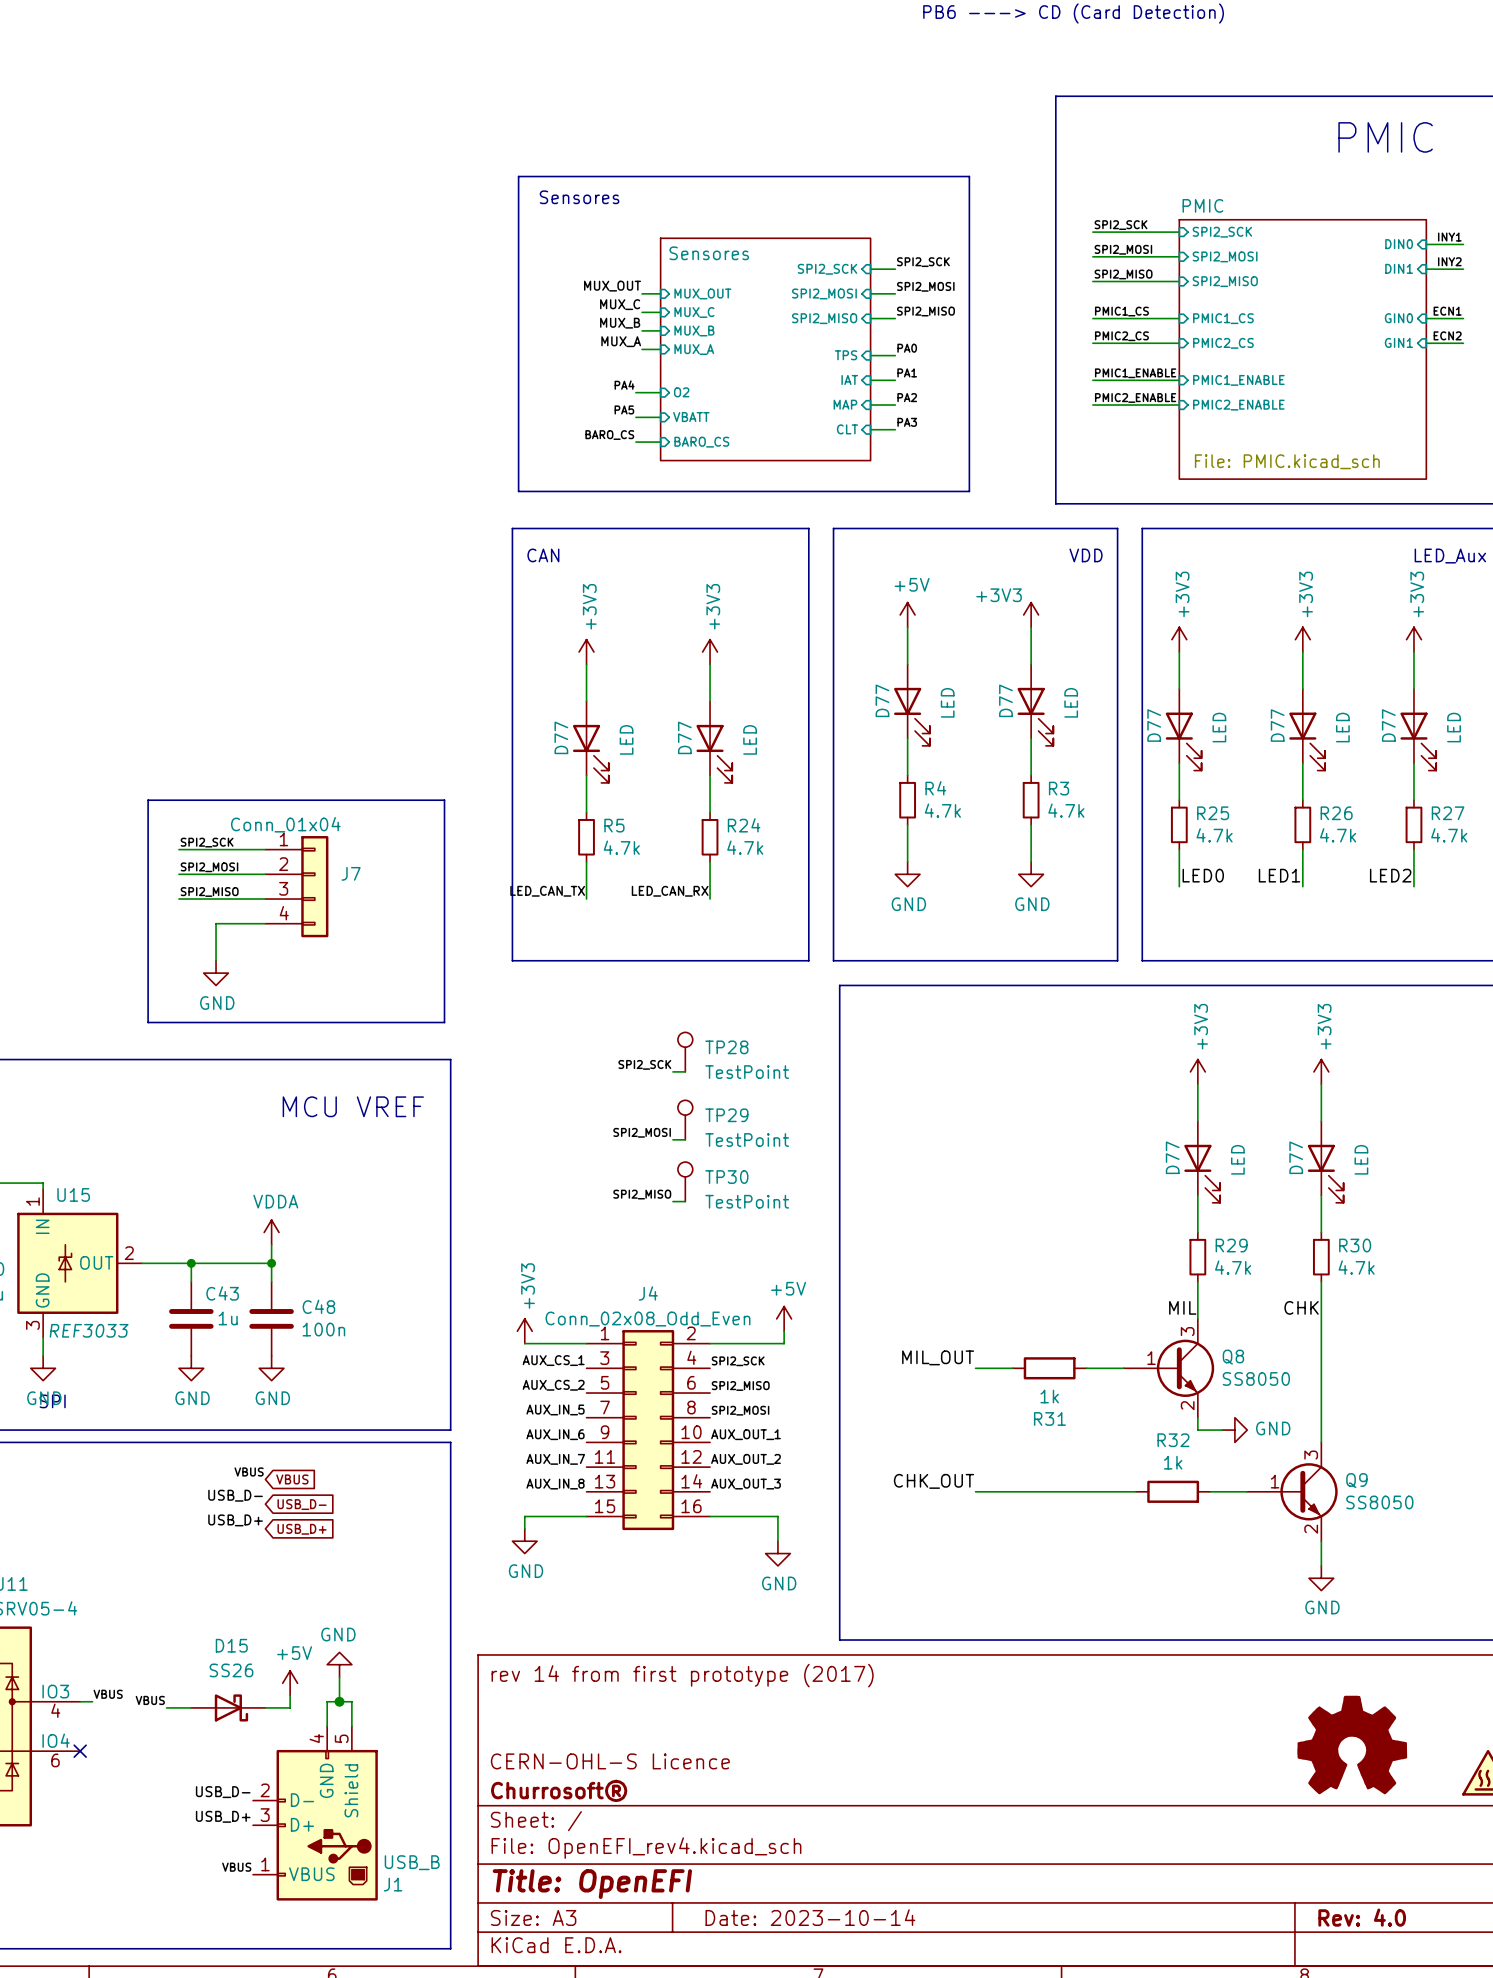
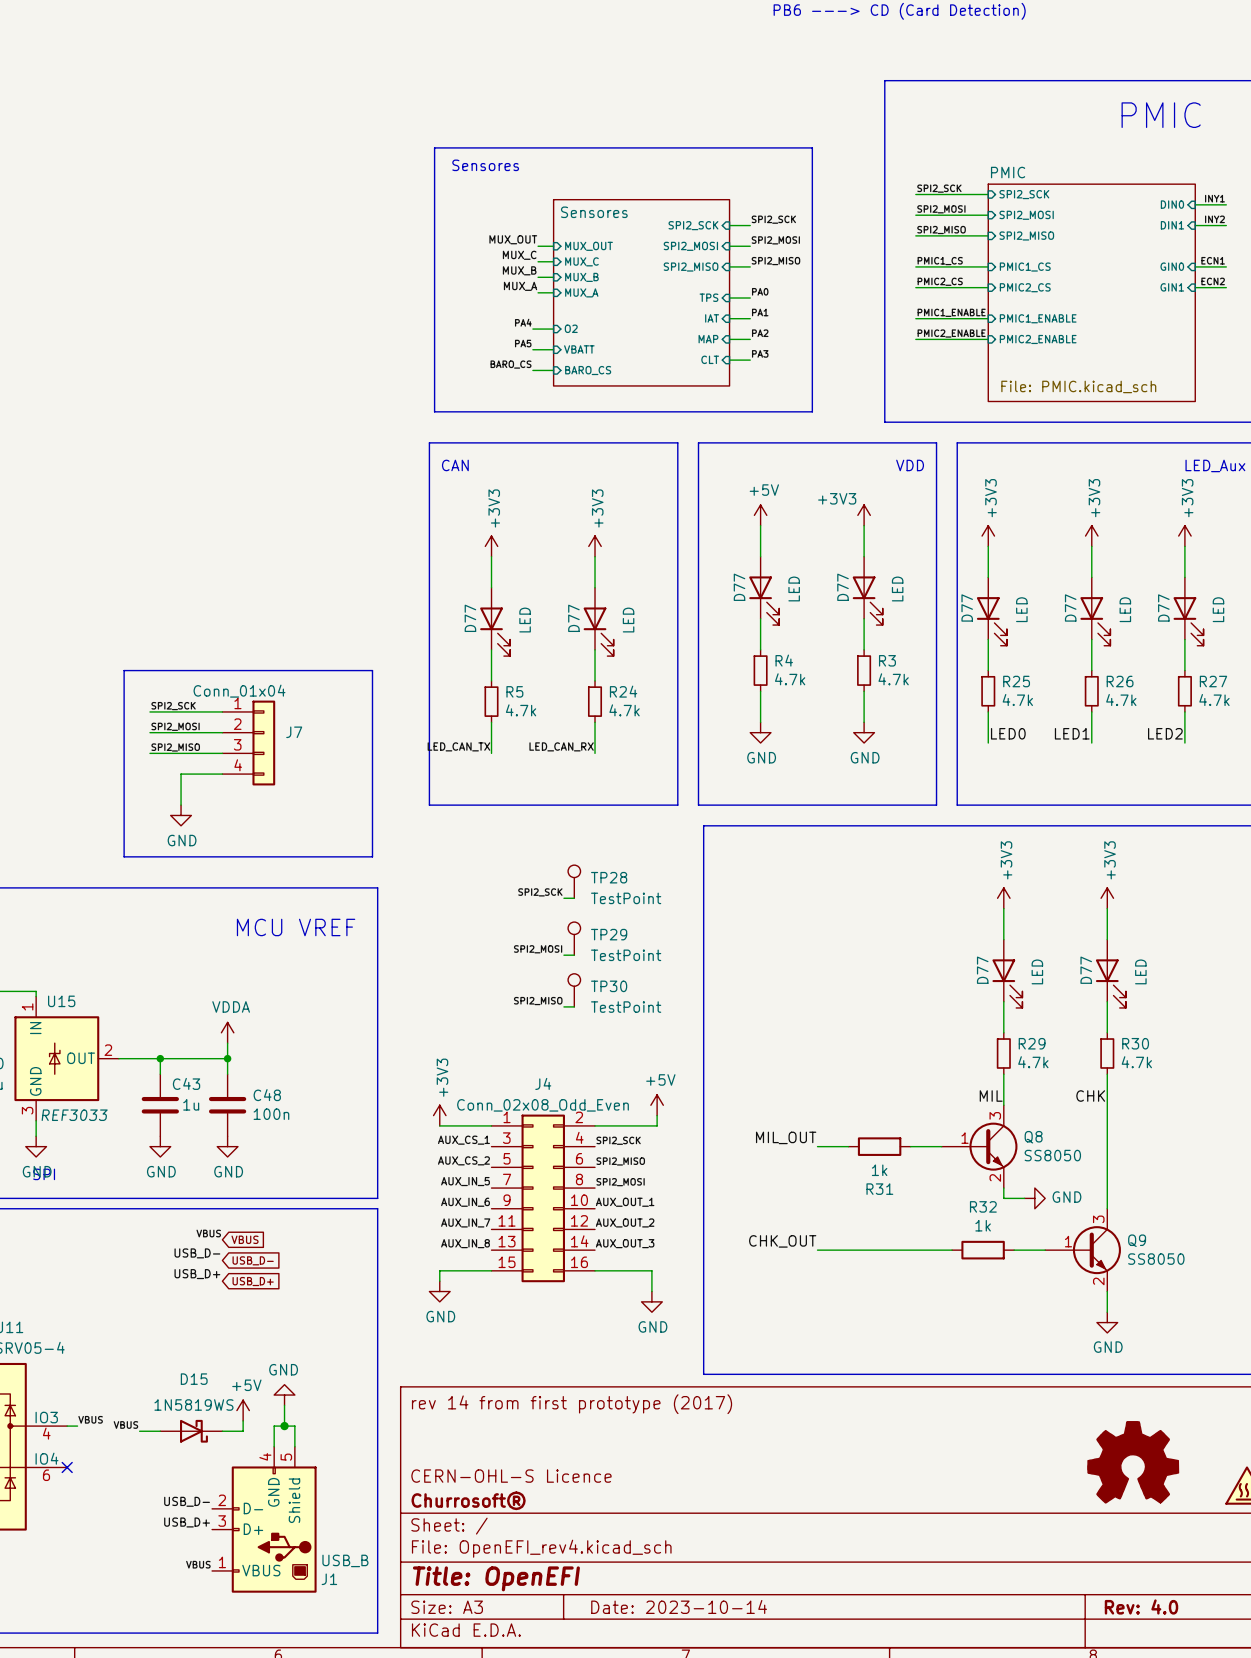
D15 value: SS26 (231, 1670) -> 1N5819WS (193, 1404)

